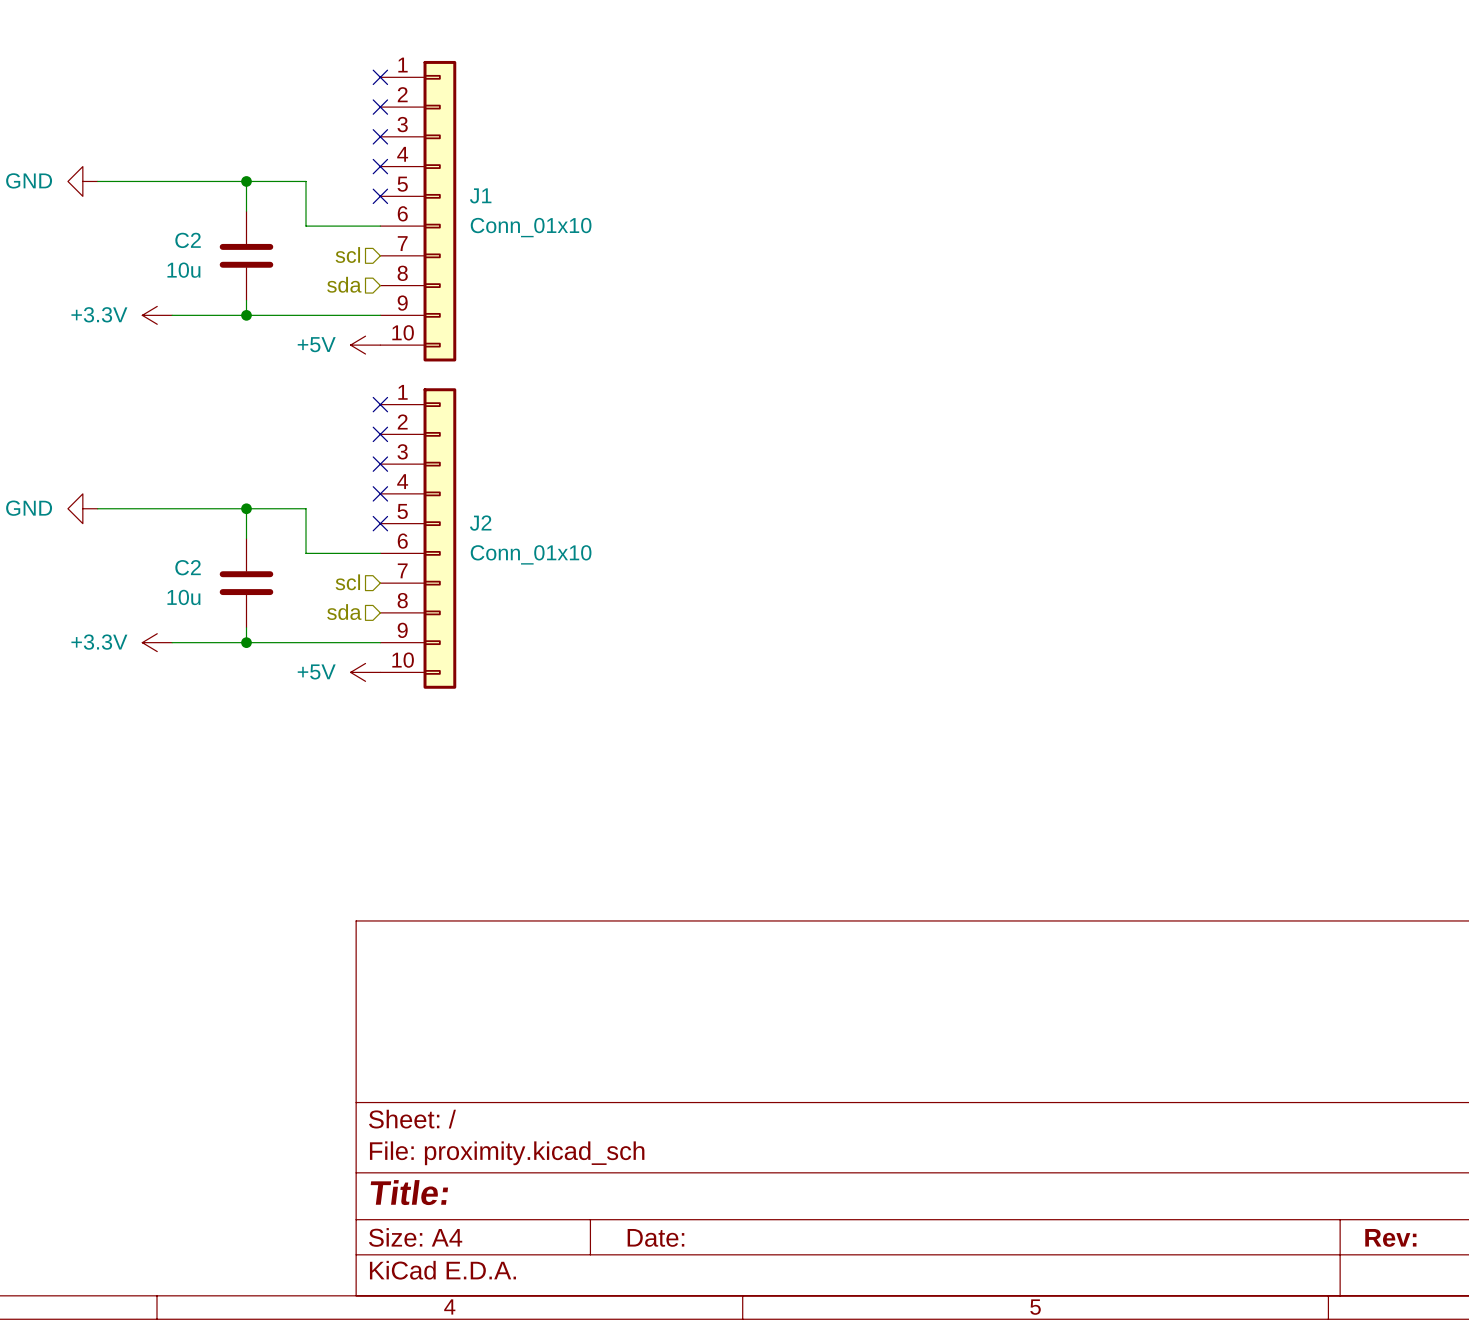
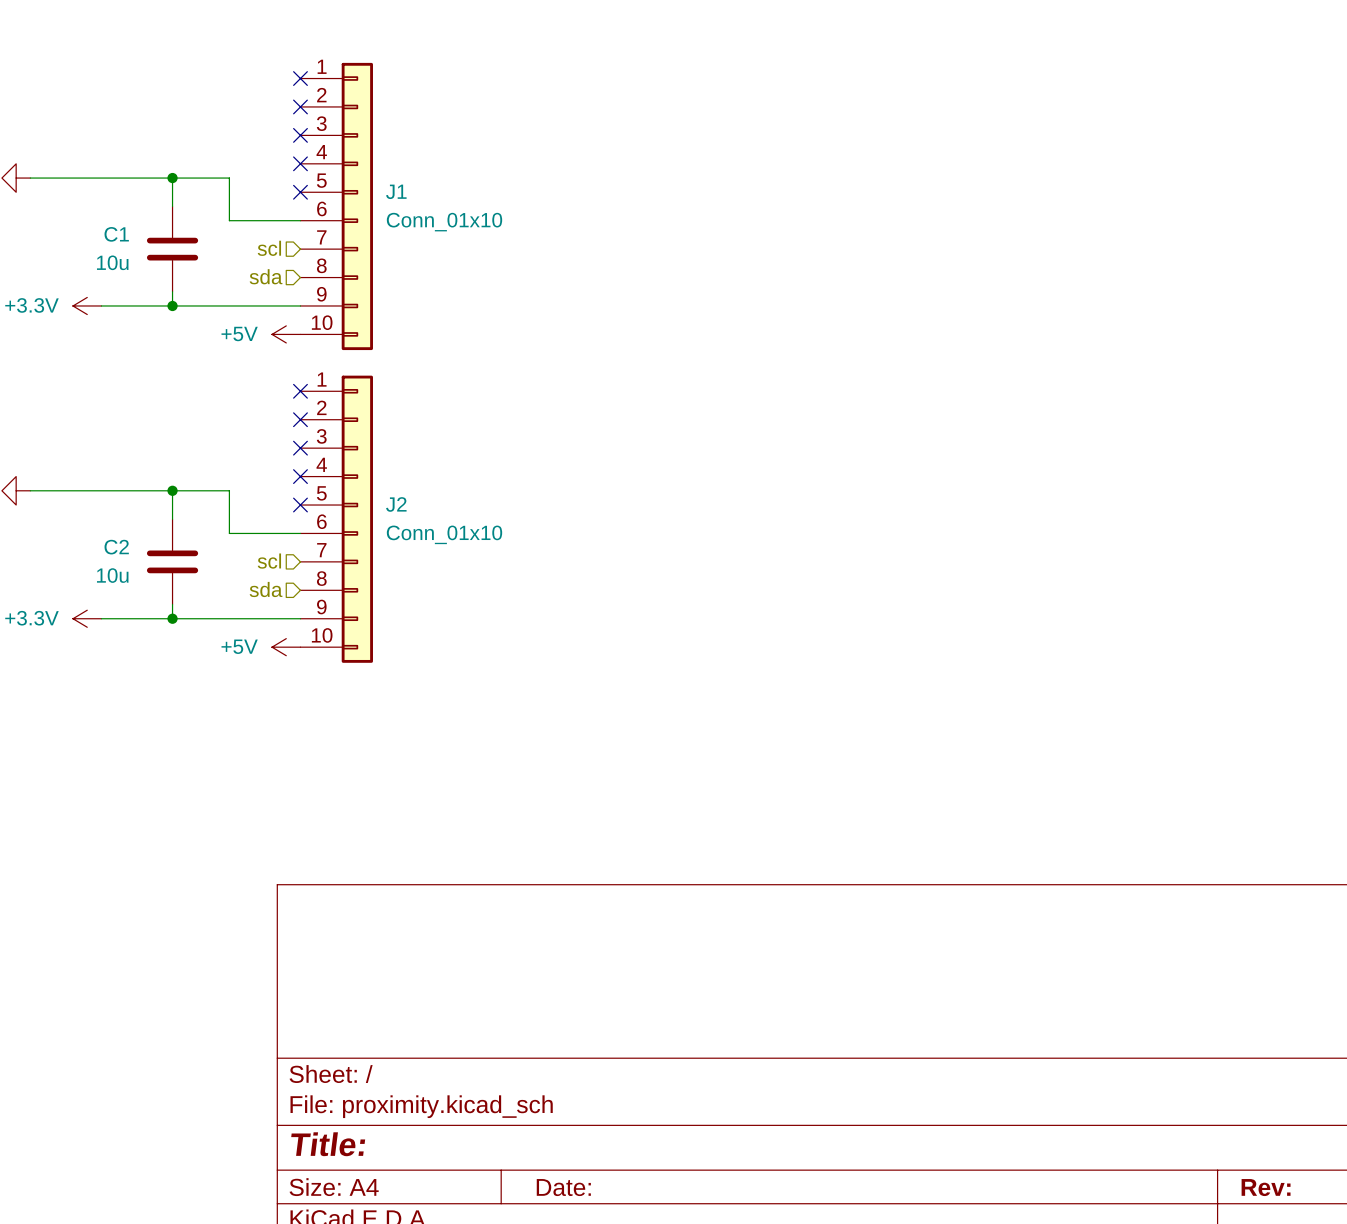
C2 name: C2 (188, 240) -> C1 (116, 234)

